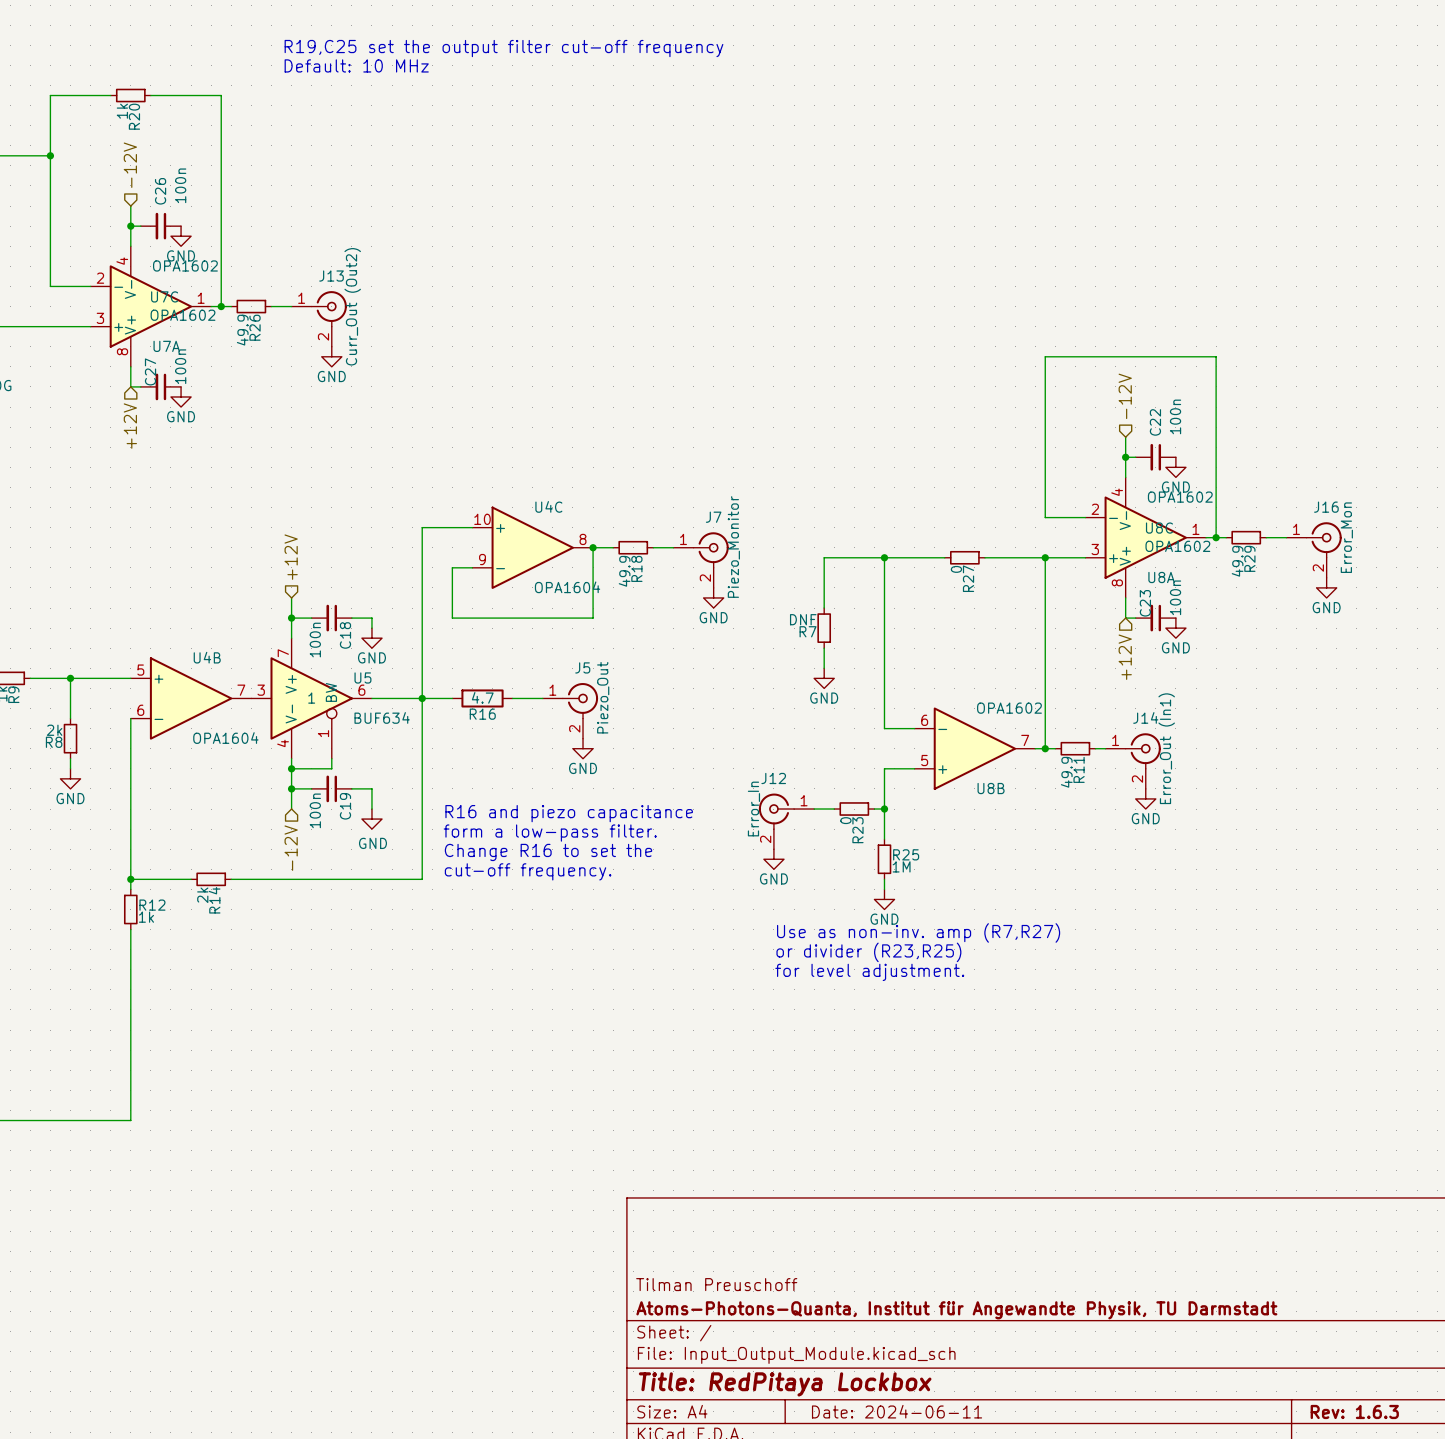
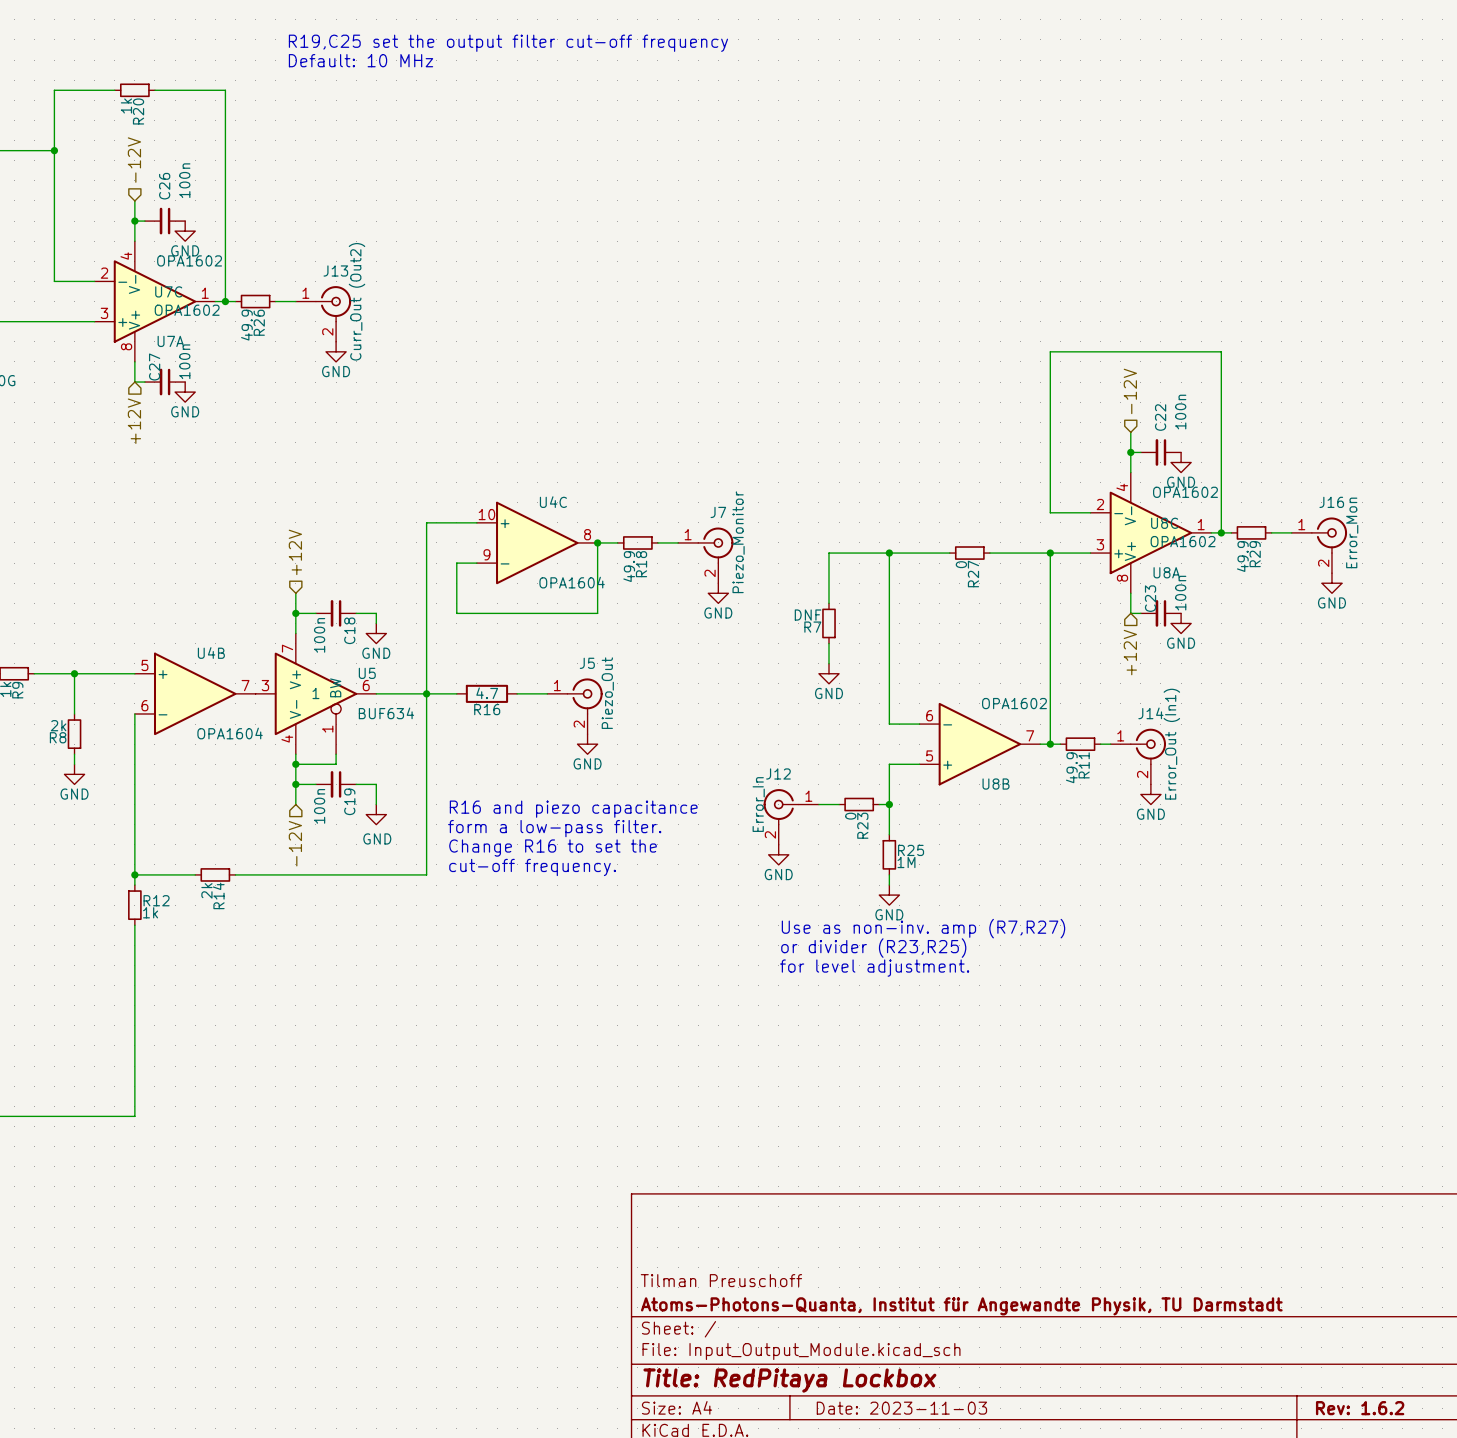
title block: Date: 2024-06-11 (897, 1411) -> Date: 2023-11-03 (901, 1408)
title block: Rev: 1.6.3 (1354, 1411) -> Rev: 1.6.2 (1360, 1408)

